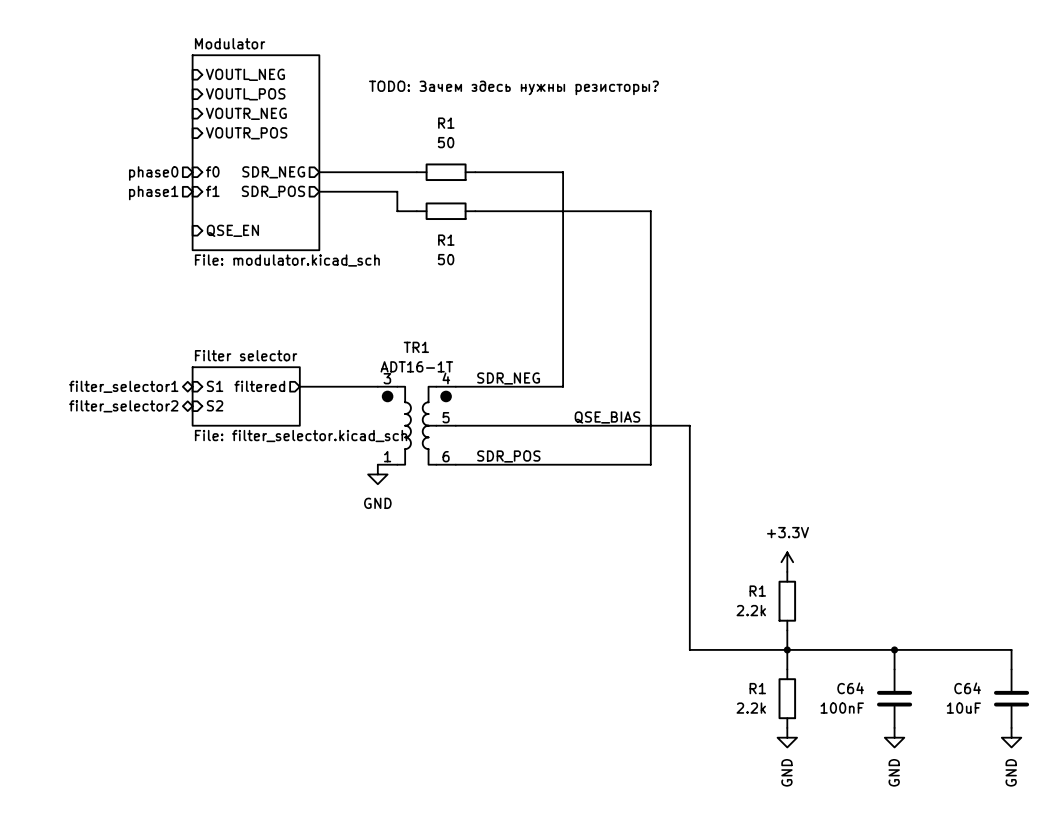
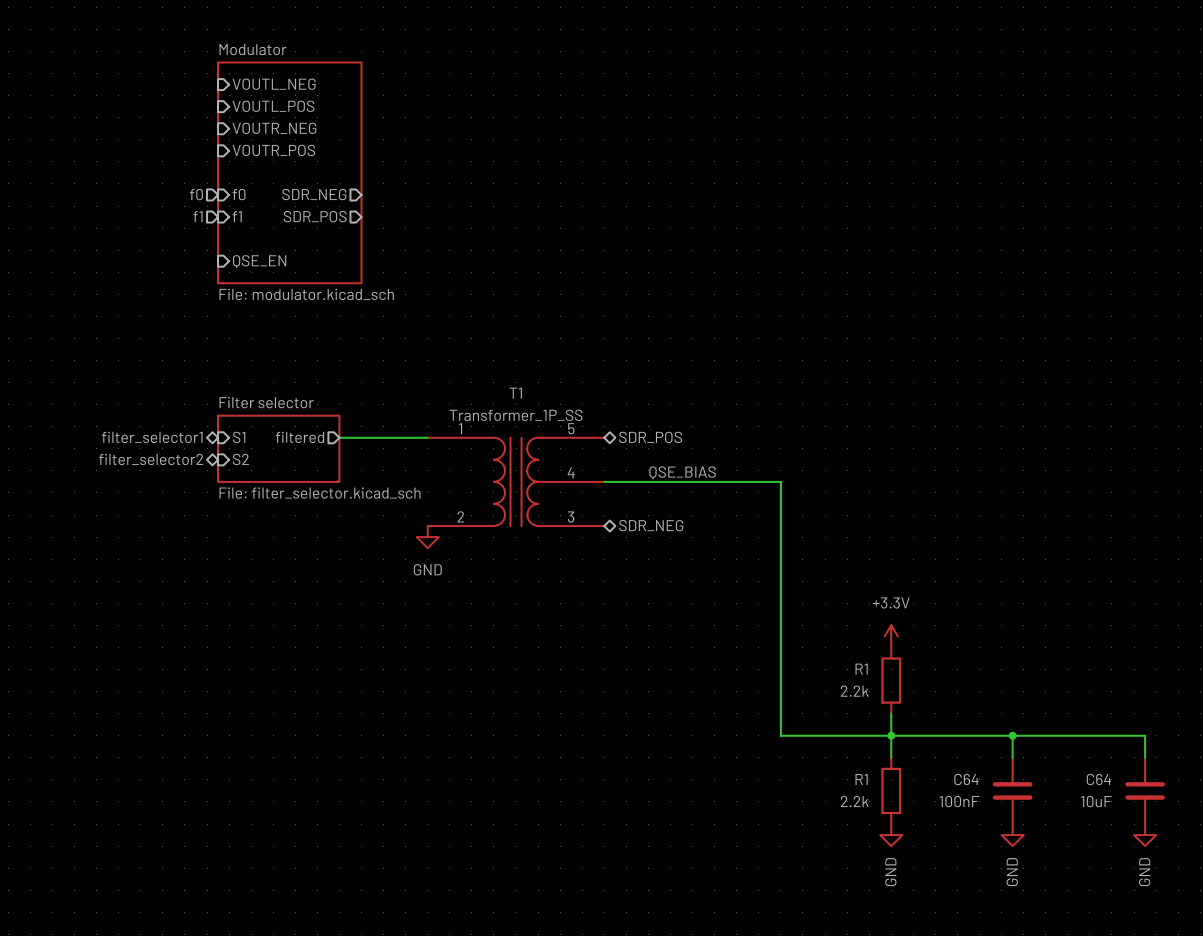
text: TODO: Зачем здесь нужны резисторы? (513, 87) -> none
wire: (319, 172) (416, 172) -> none
R1: 50 (446, 172) -> none
wire: (475, 172) (563, 172) (563, 386) (455, 386) -> none
hierarchical label: phase0 (153, 173) -> f0 (196, 194)
wire: (319, 191) (397, 191) (397, 211) (416, 211) -> none
hierarchical label: phase1 (153, 192) -> f1 (197, 216)
R1: 50 (446, 211) -> none
wire: (475, 211) (650, 211) (650, 464) (455, 464) -> none
label: SDR_NEG (508, 378) -> none
hierarchical label: none -> SDR_POS (650, 437)
TR1: ADT16-1T (416, 425) -> none
T1: none -> Transformer_1P_SS (516, 481)
label: SDR_POS (508, 456) -> none
hierarchical label: none -> SDR_NEG (651, 525)

